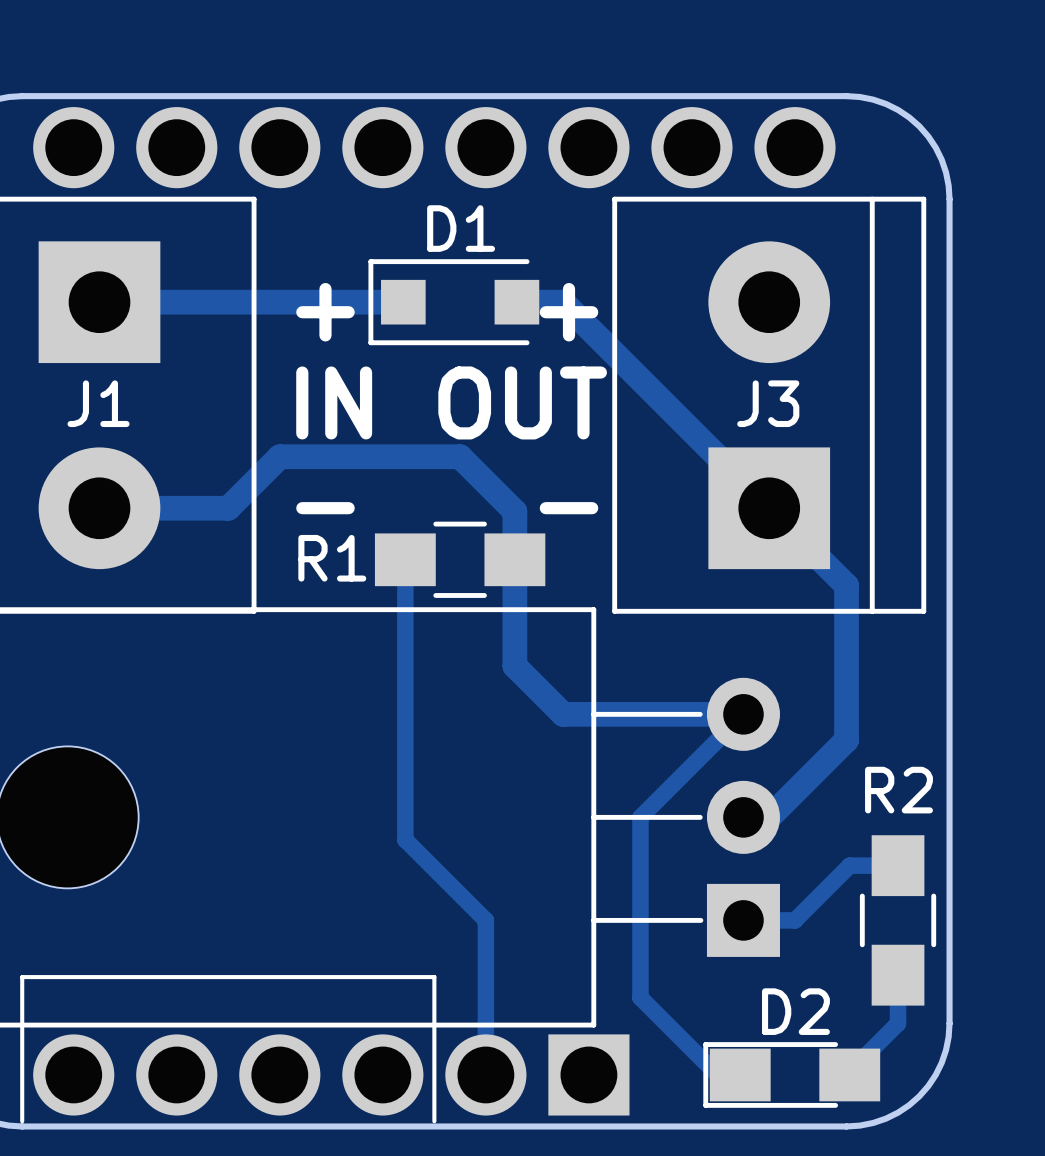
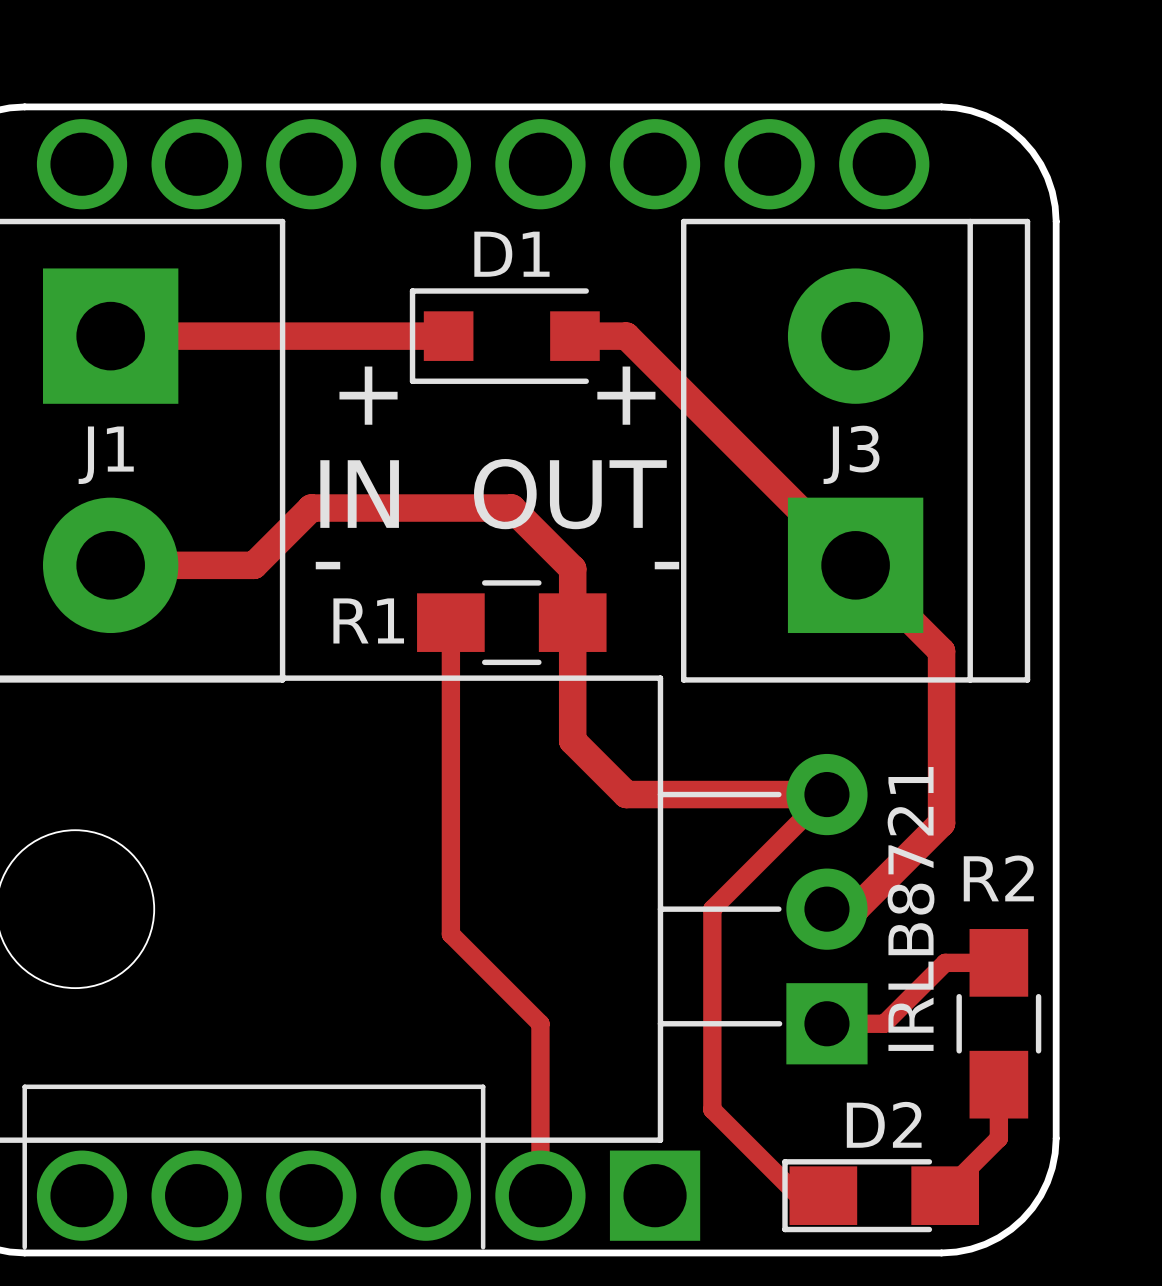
text position: + (325, 312) -> + (368, 395)
text position: + (569, 312) -> + (626, 395)
text position: IN (334, 402) -> IN (359, 494)
text position: OUT (522, 402) -> OUT (570, 494)
part value: none -> IRLB8721 (911, 908)

